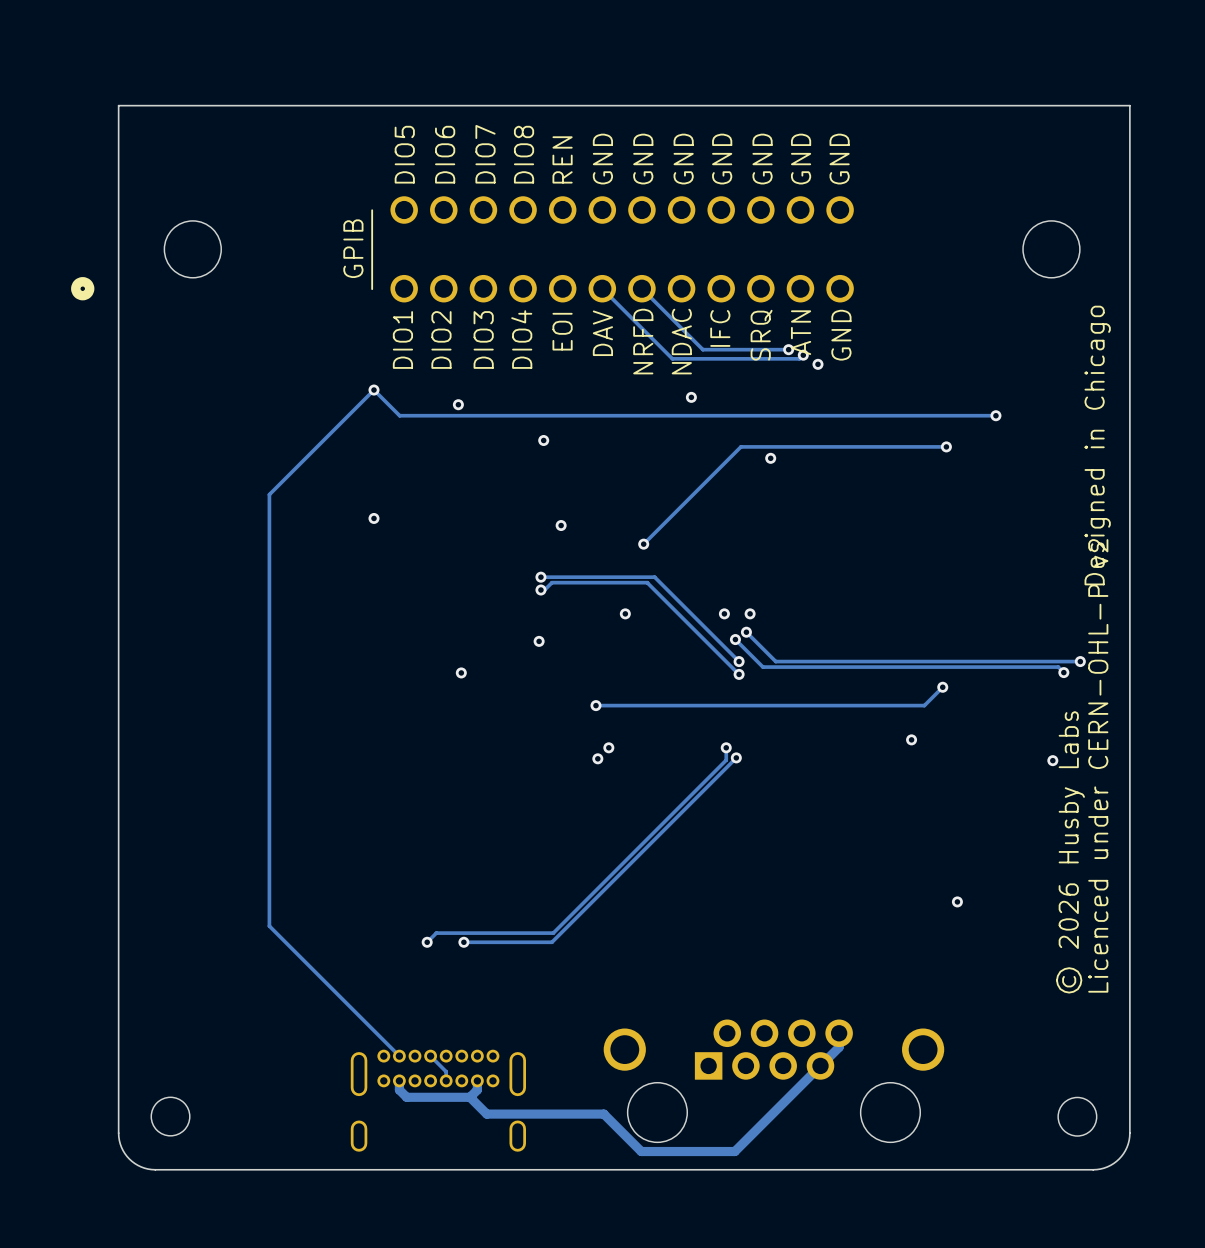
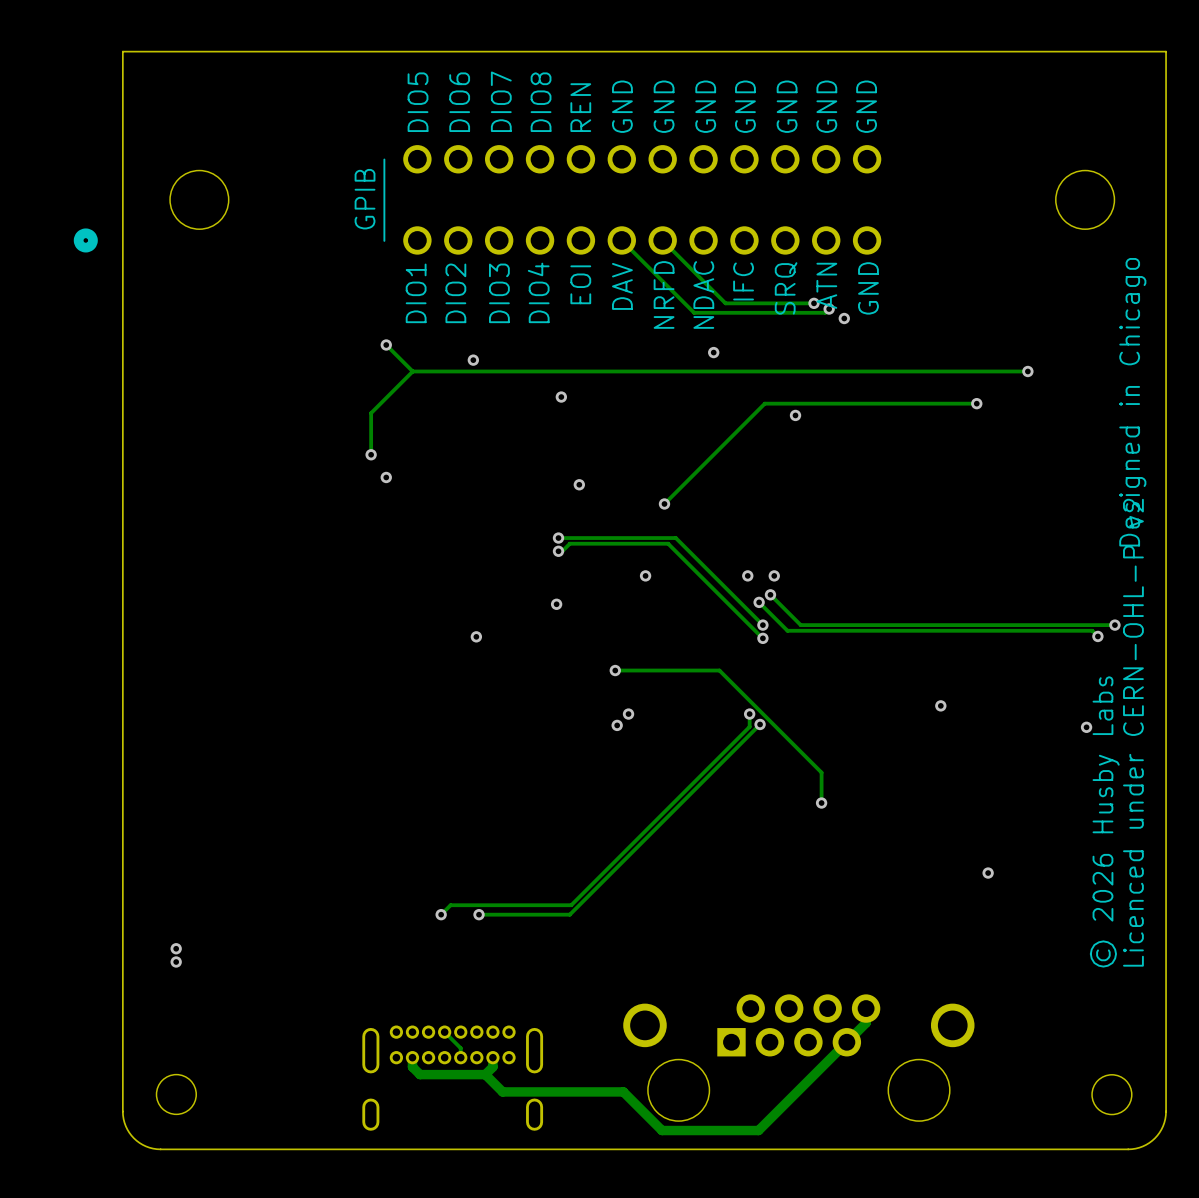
track: (373, 390) (269, 494) (269, 926) (399, 1056) -> none
track: none -> (412, 371) (371, 413) (371, 454)
via: none -> (371, 454)
track: (942, 687) (924, 705) (697, 705) -> (821, 803) (821, 772) (719, 670)
via: (942, 687) -> none
via: none -> (821, 803)
via: none -> (176, 948)
via: none -> (176, 961)

